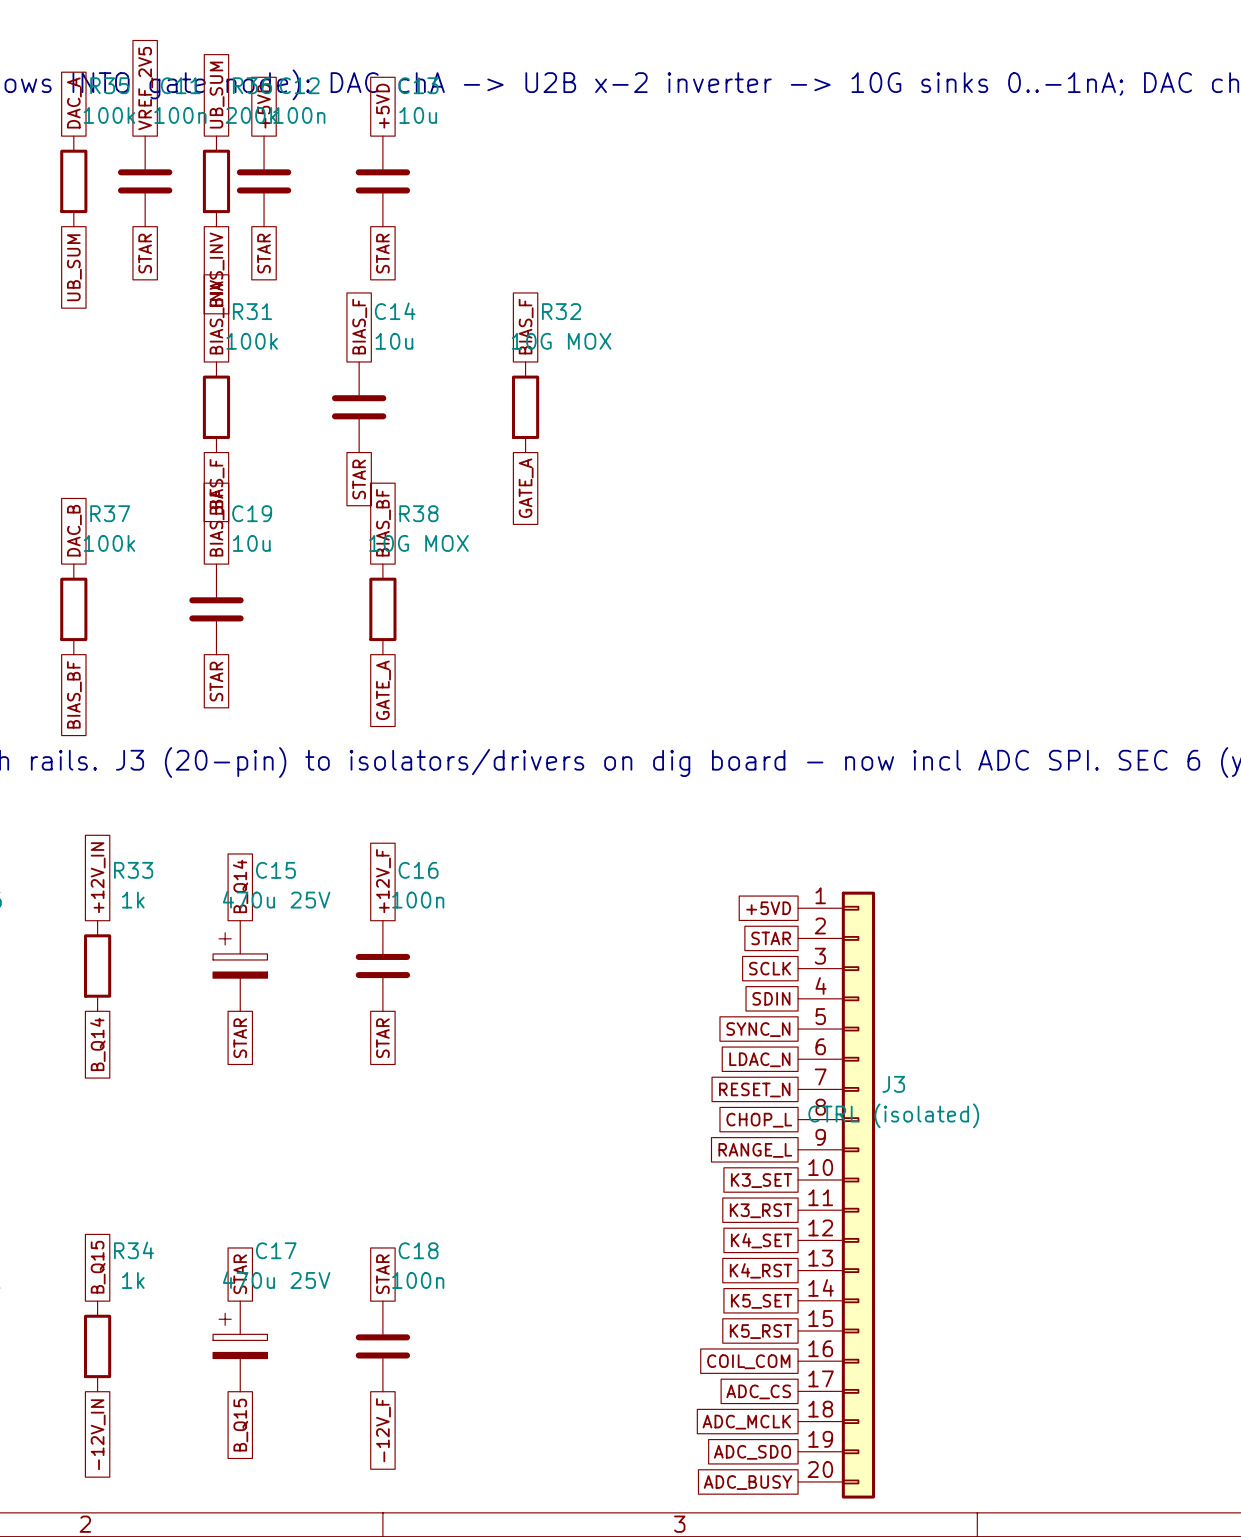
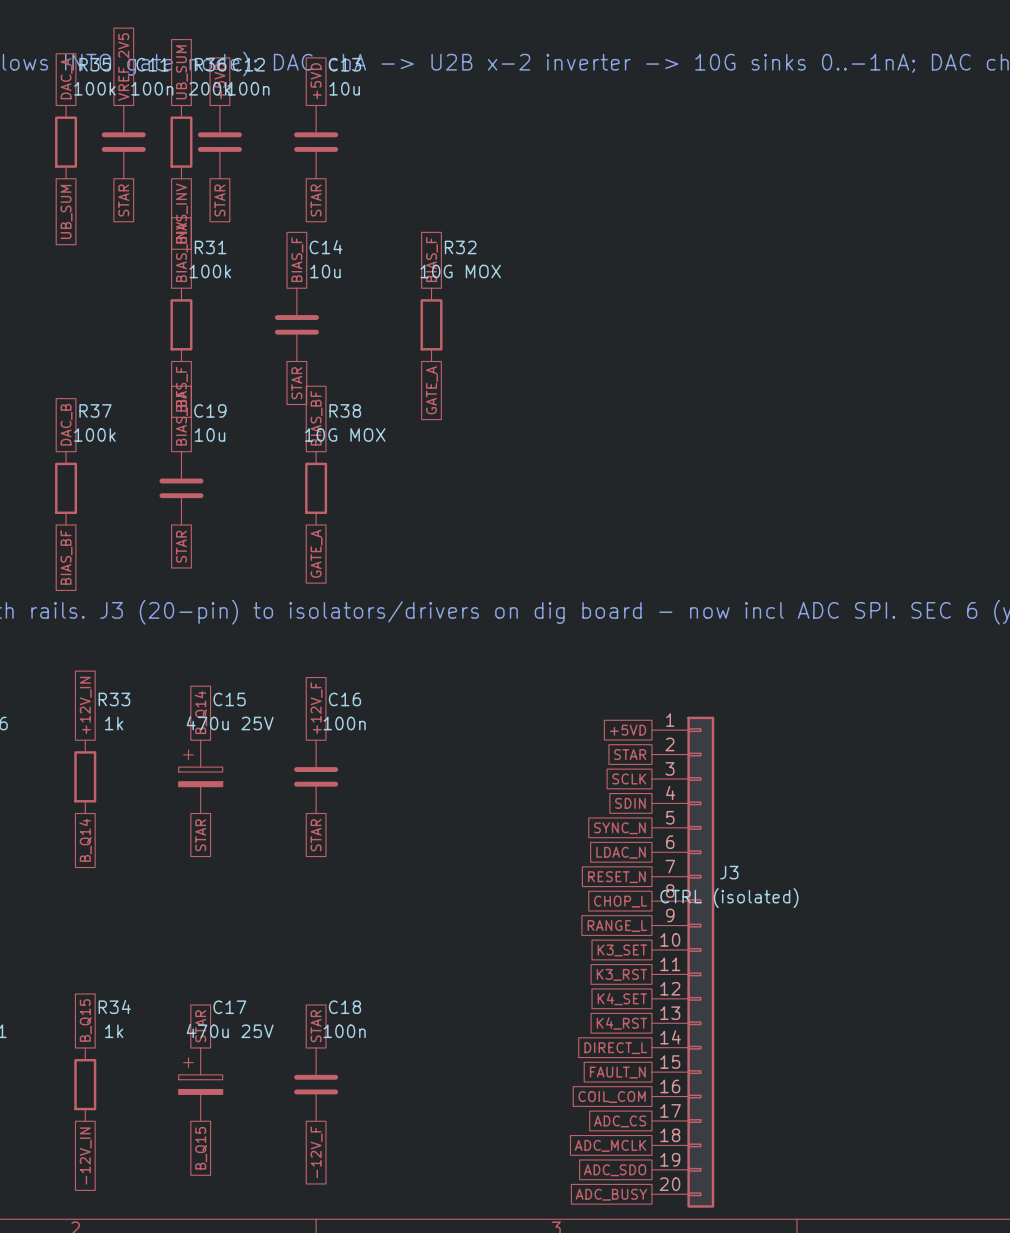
global label: K5_SET (761, 1301) -> DIRECT_L (615, 1048)
global label: K5_RST (760, 1331) -> FAULT_N (617, 1072)

